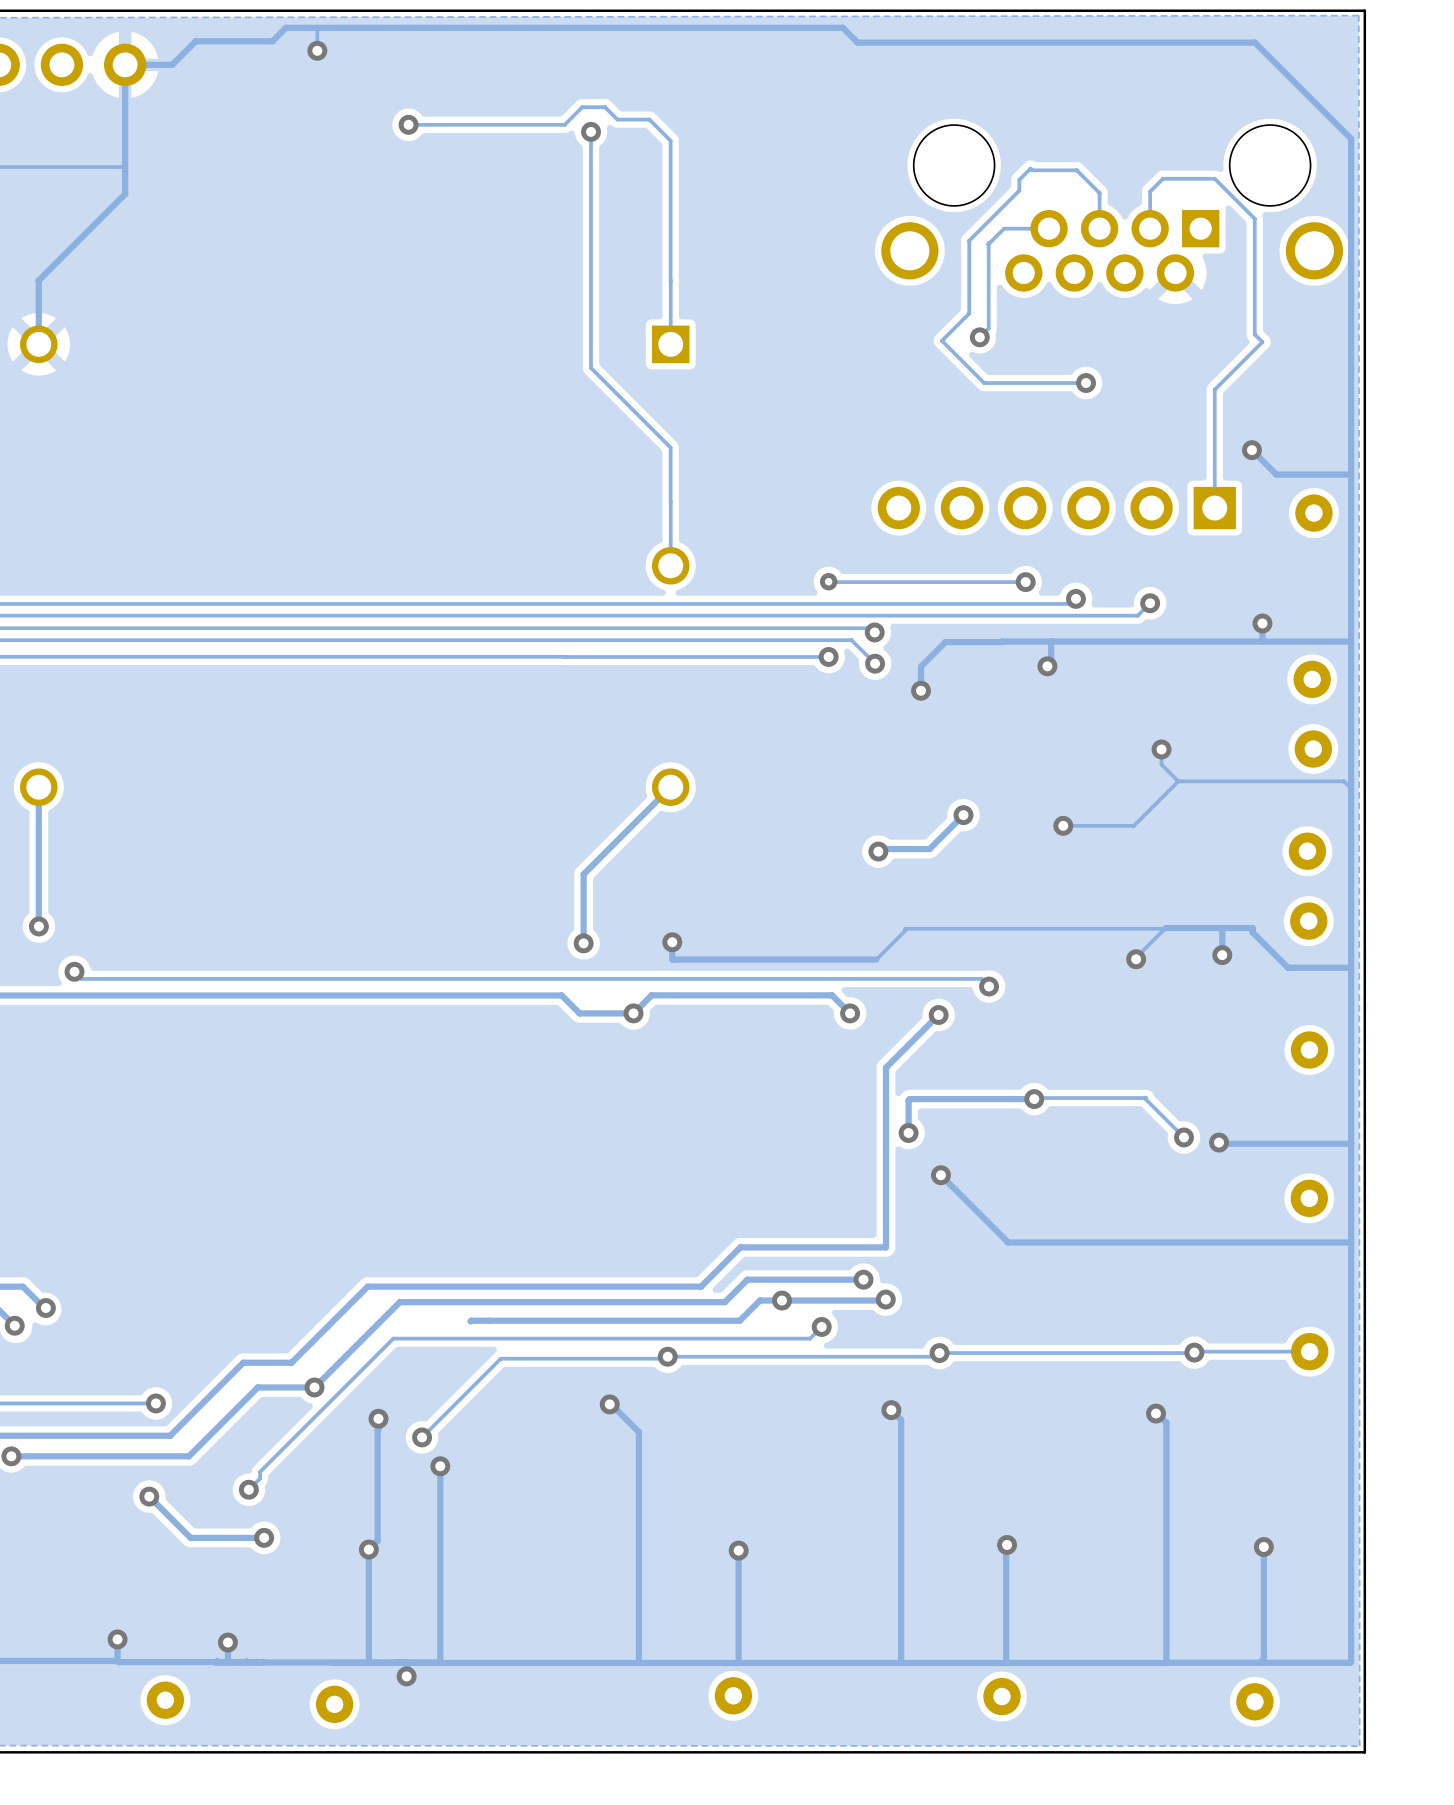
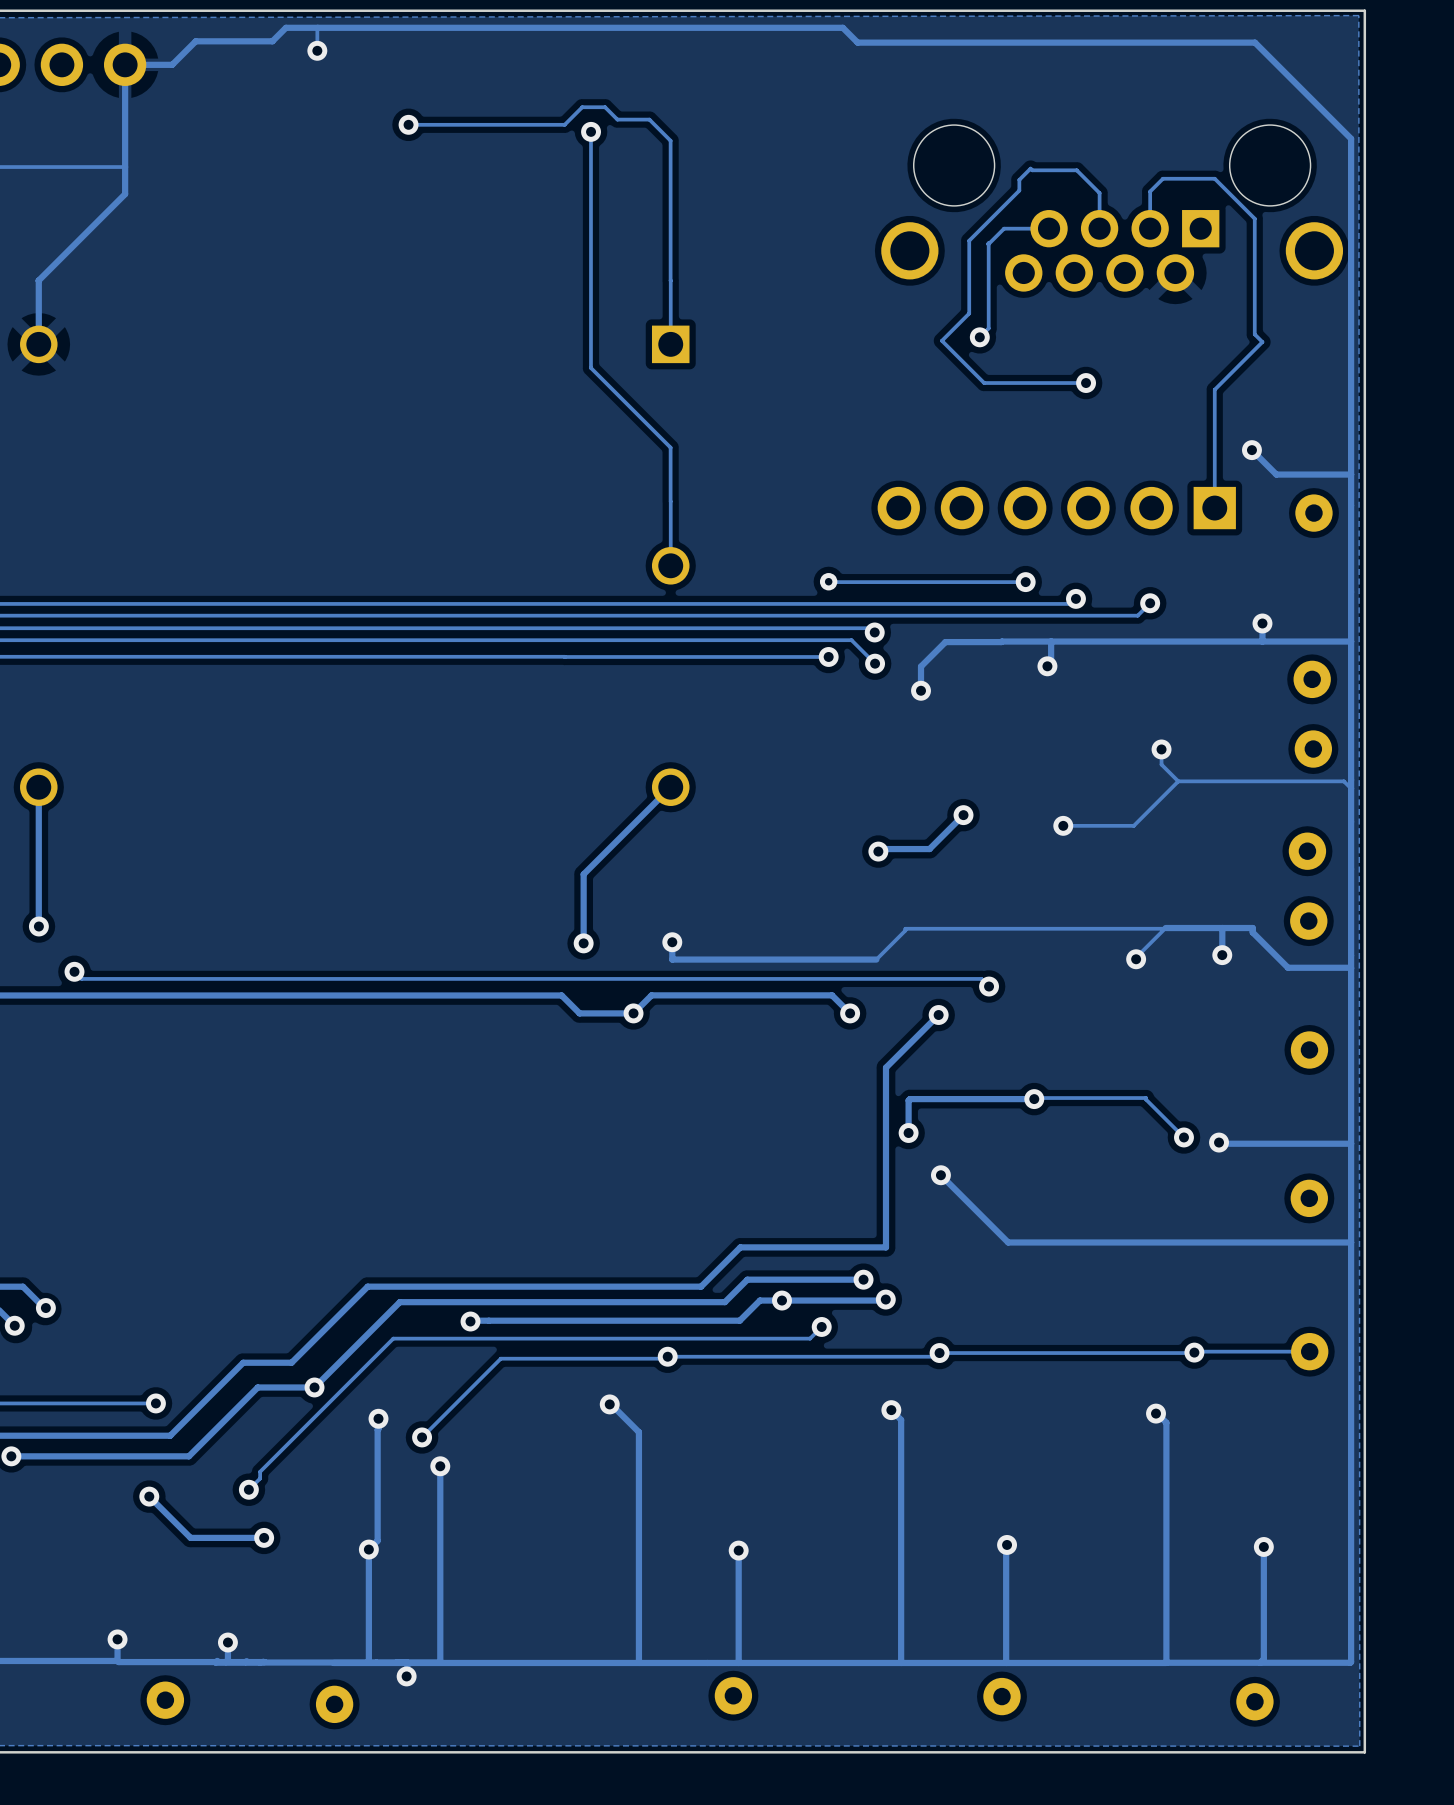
via: none -> (470, 1321)

